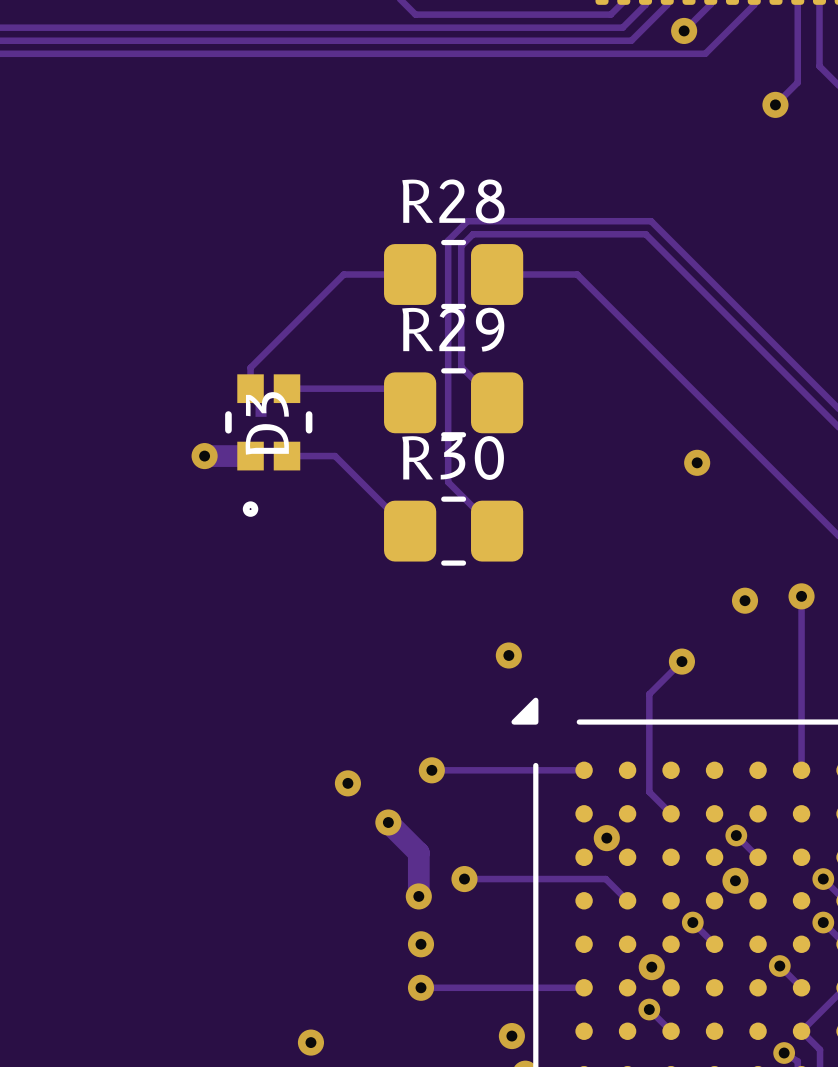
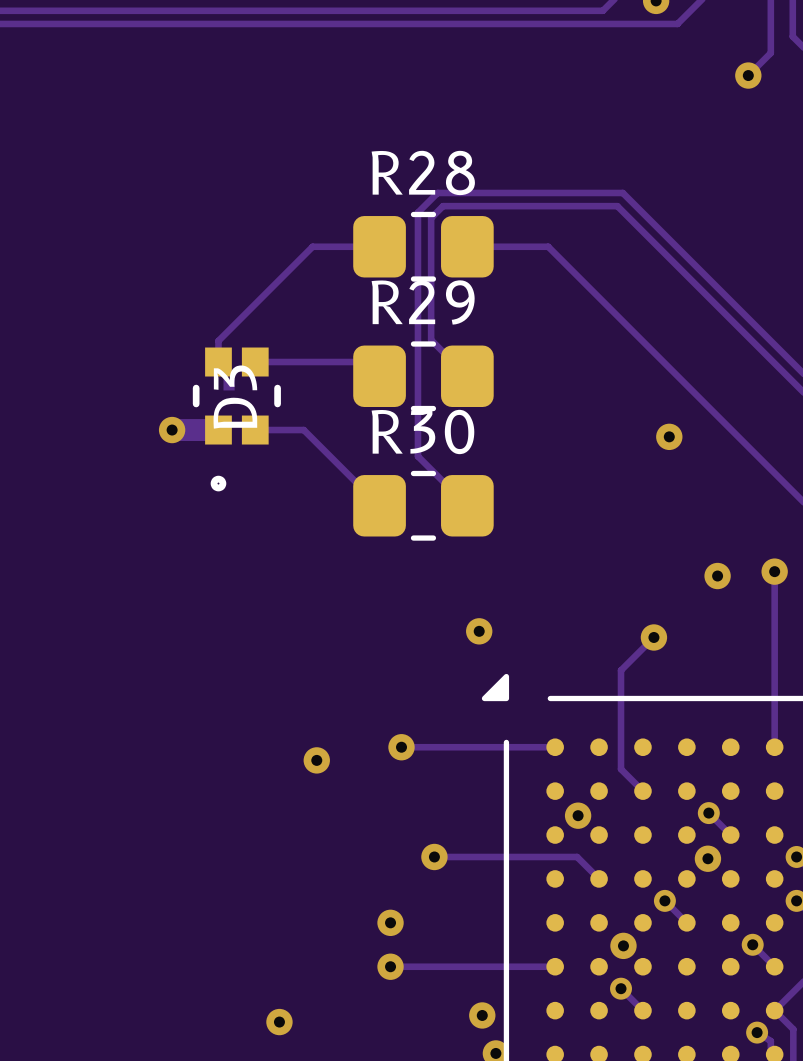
track: (388, 822) (418, 852) (418, 896) -> none
via: (388, 822) -> none
via: (418, 896) -> none

